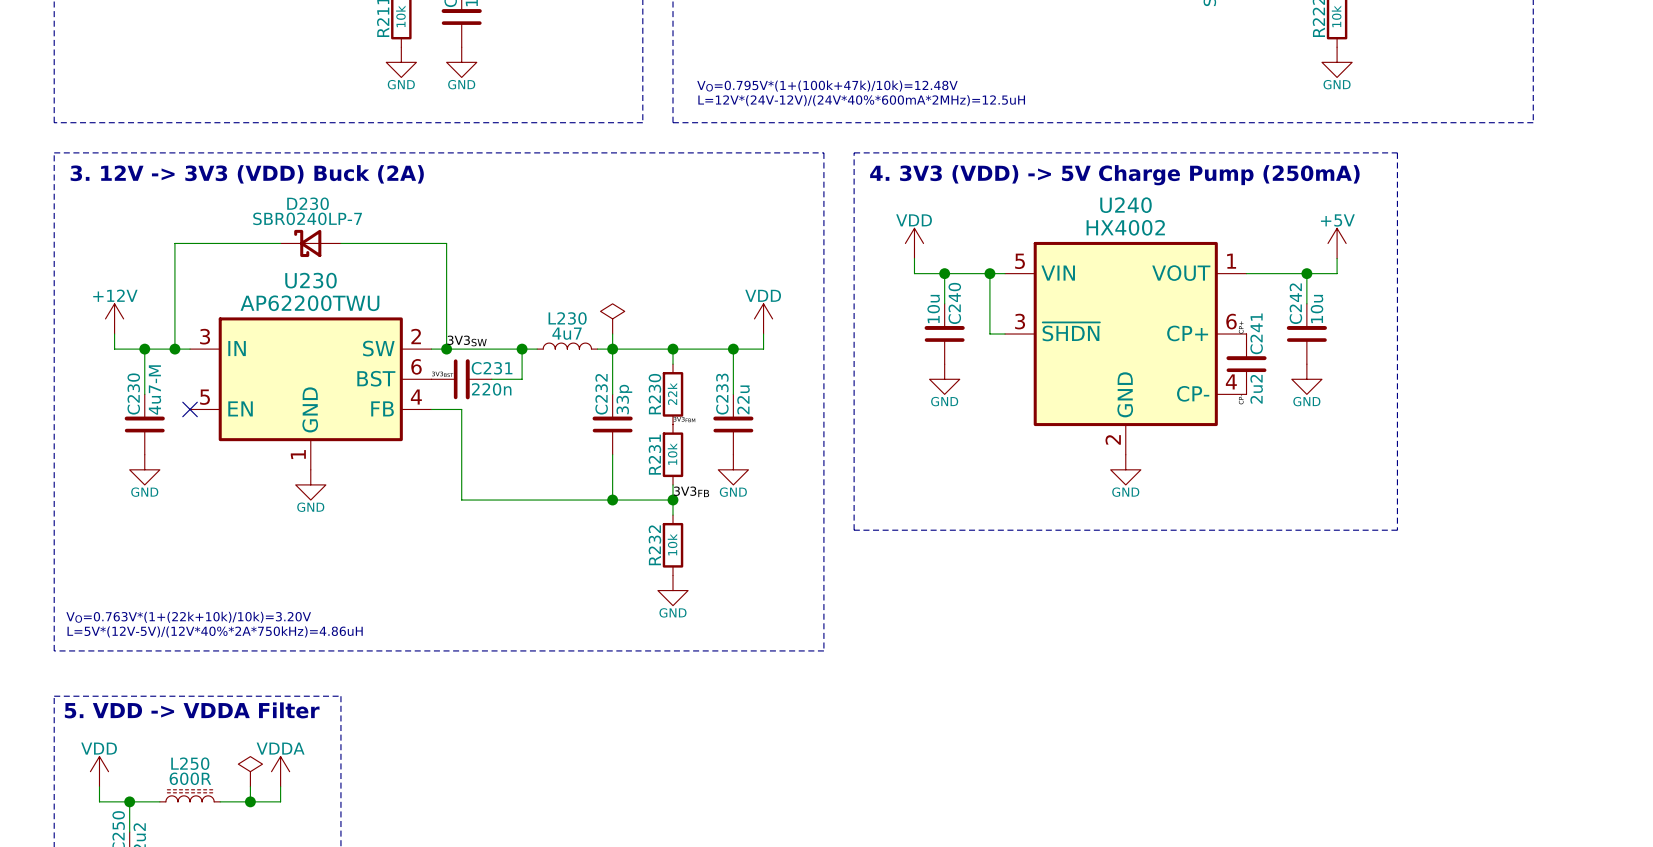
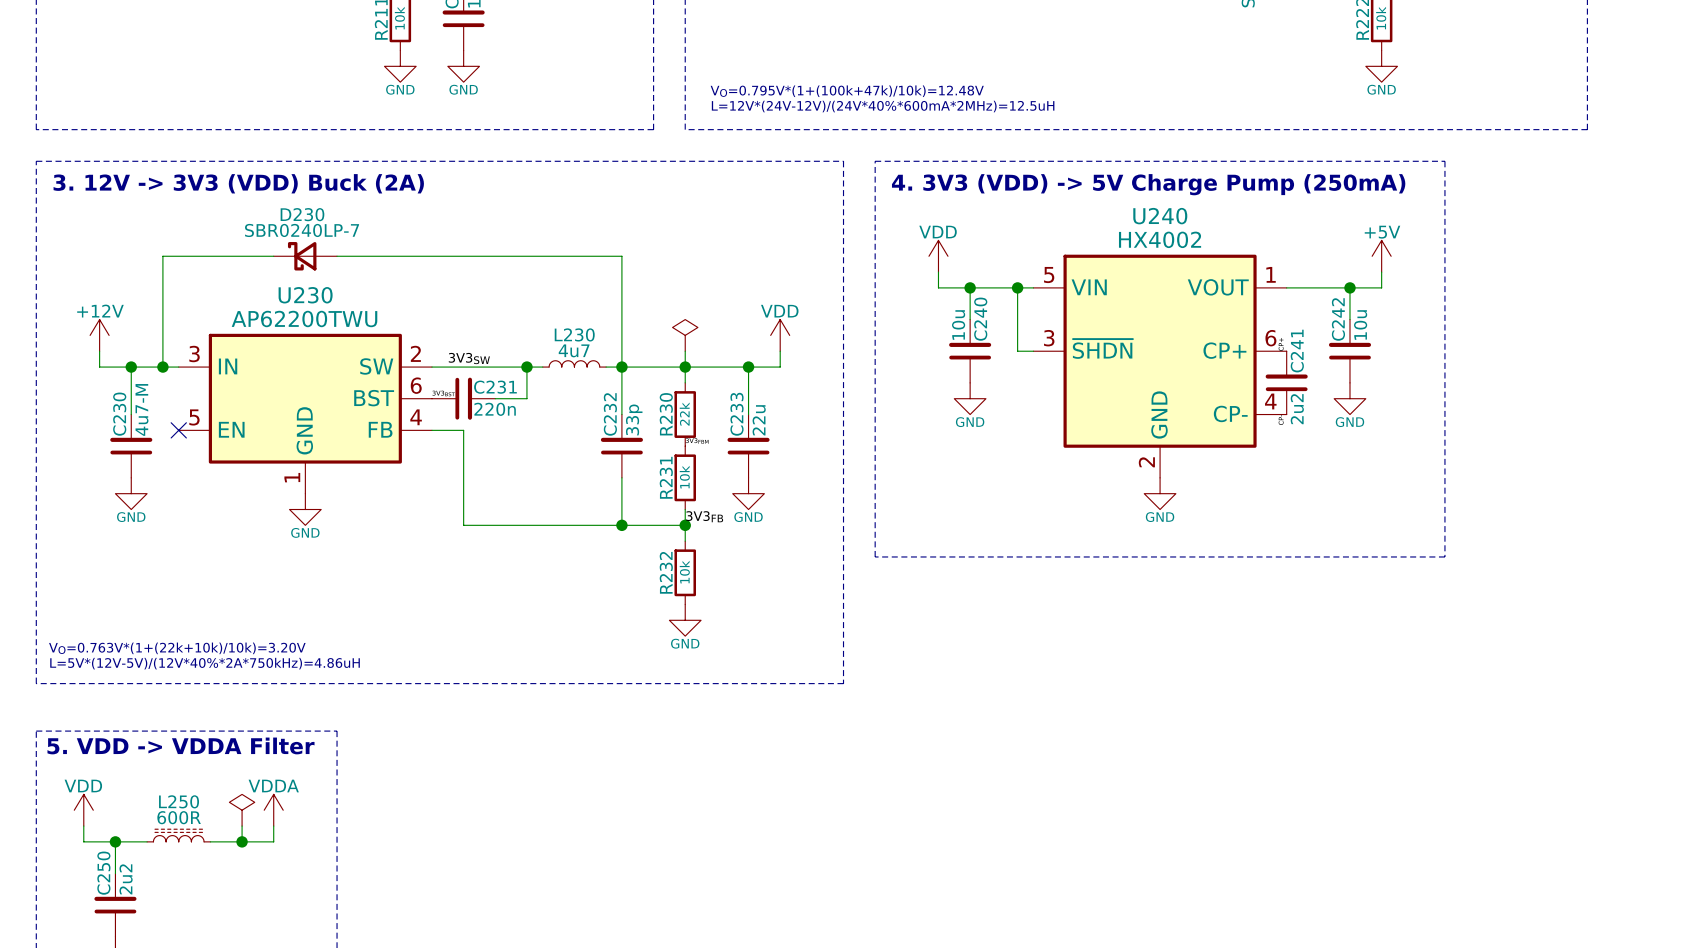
wire: (446, 243) (446, 349) -> (447, 256) (621, 256) (621, 351)
power symbol position: (612, 318) -> (685, 335)
wire: none -> (685, 351) (685, 367)
junction: (446, 349) -> none

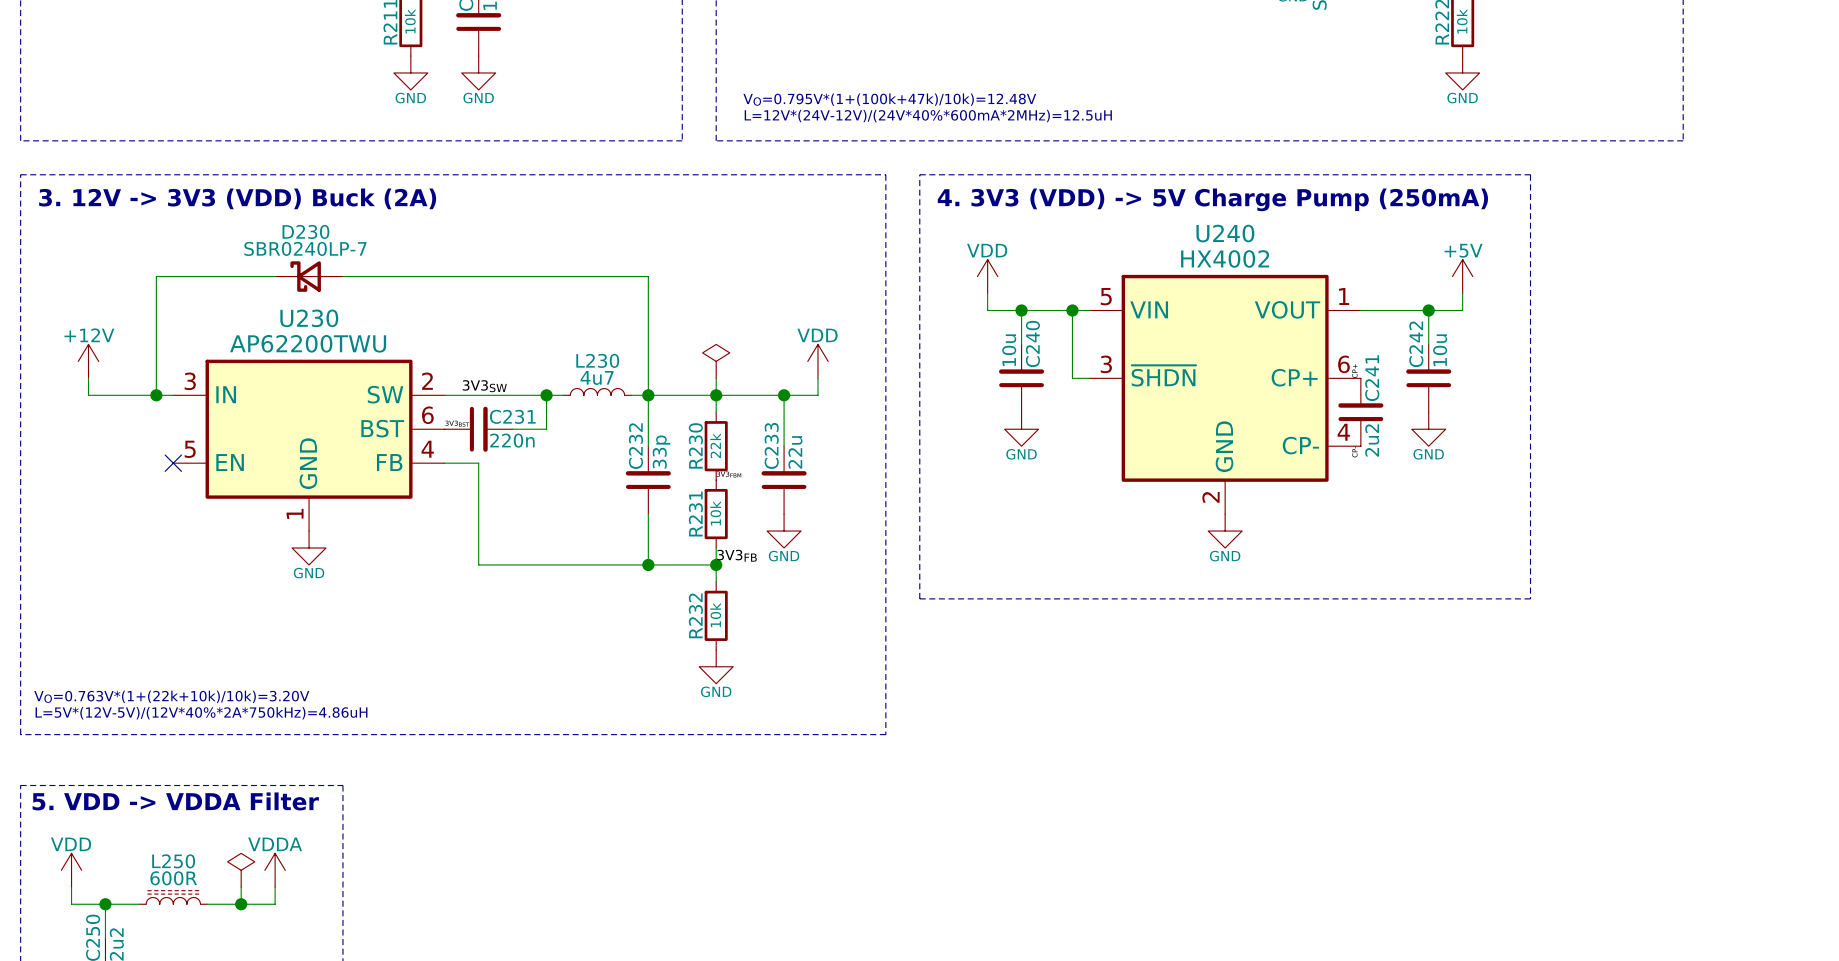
wire: (131, 367) (131, 414) -> none
junction: (131, 367) -> none
C230: 4u7-M (131, 446) -> none
power symbol: GND (131, 493) -> none

